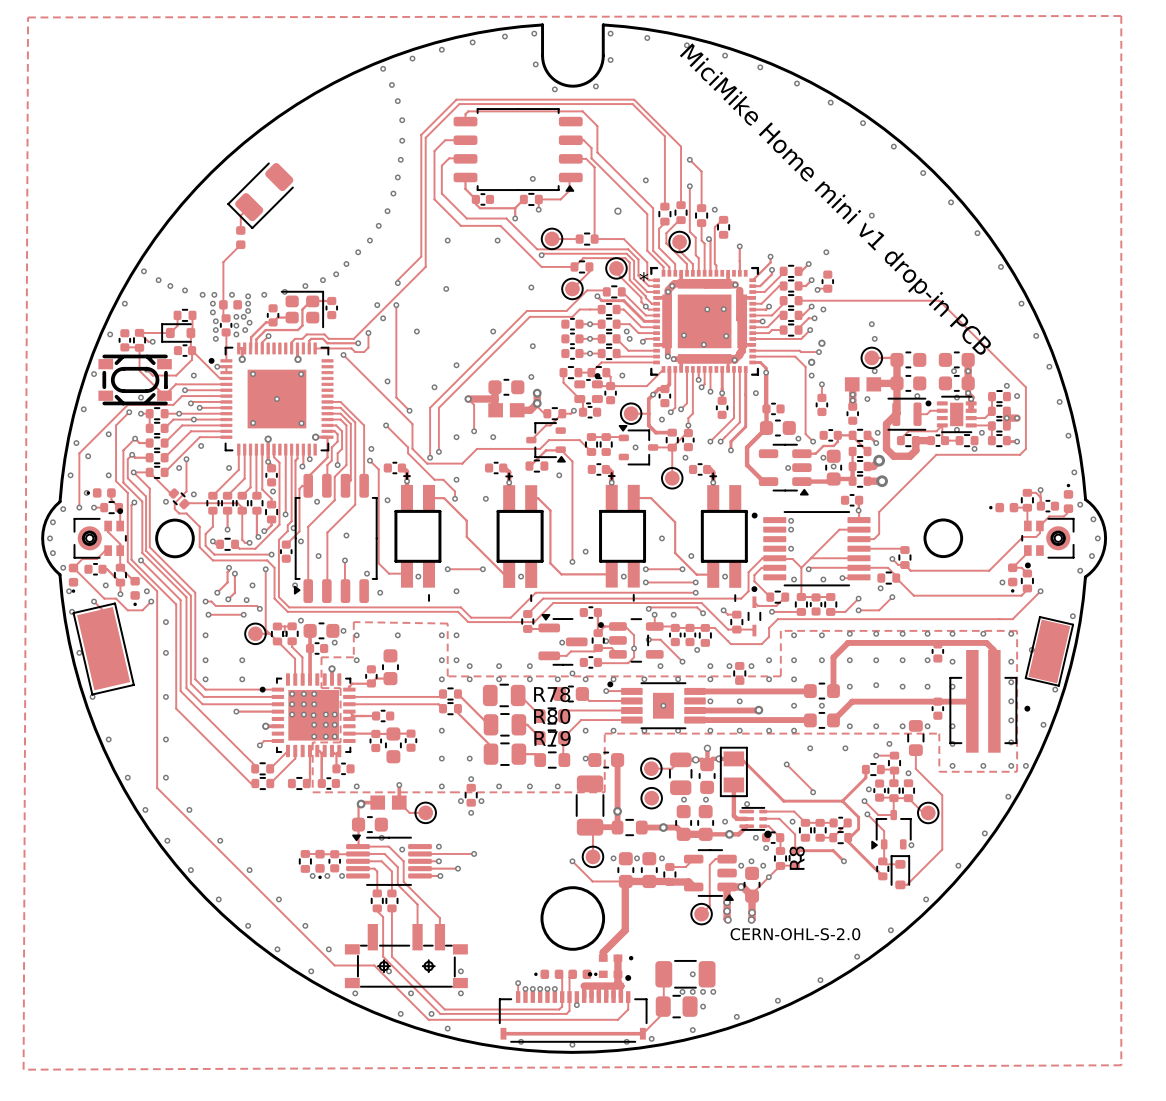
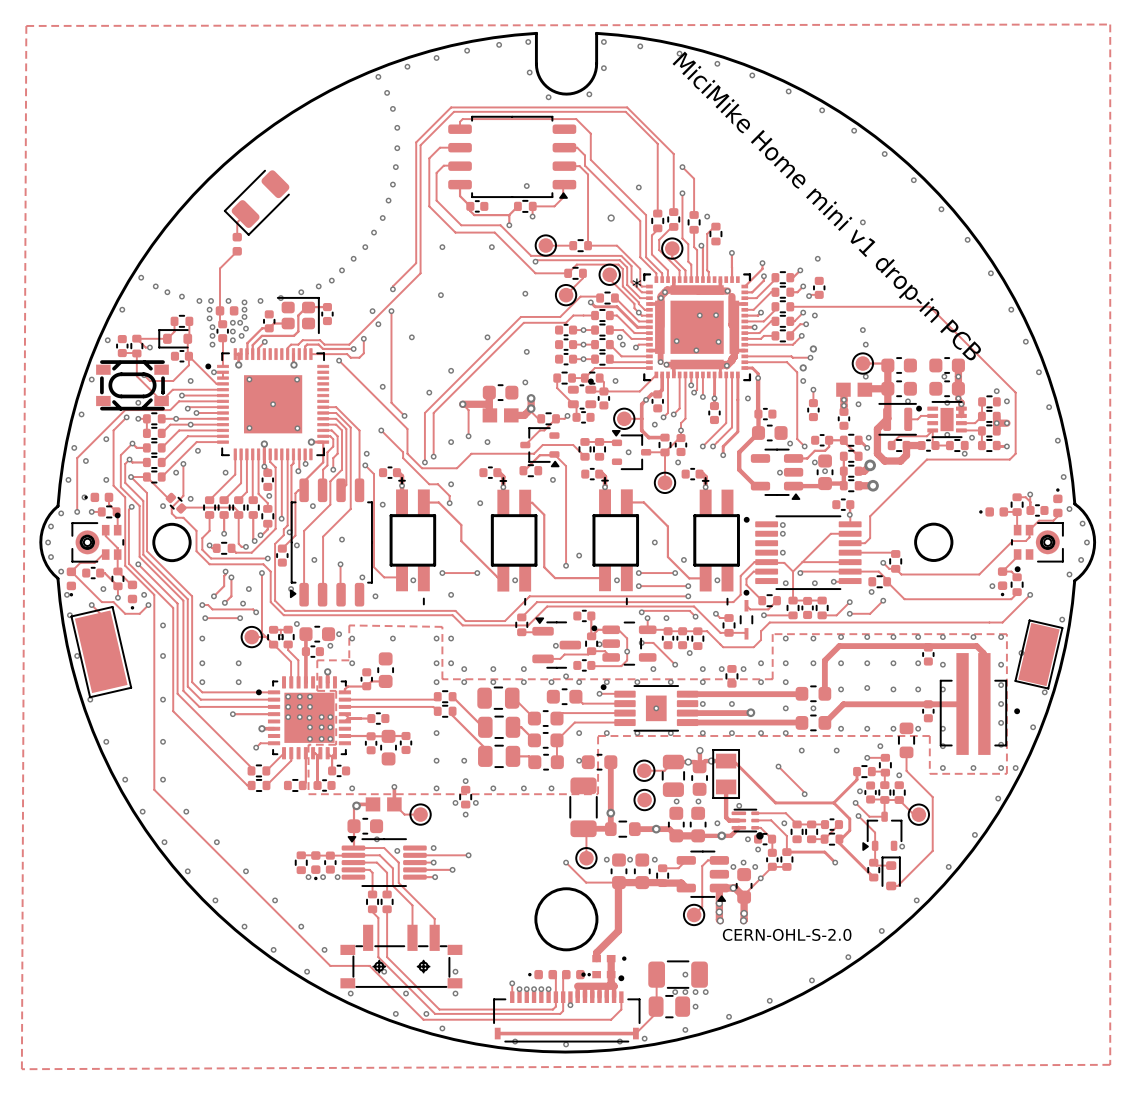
R78: (551, 716) -> none
part: none -> (545, 718)
R80: (551, 738) -> none
part: none -> (545, 740)
R79: (552, 760) -> none
part: none -> (546, 762)
R8: (780, 858) -> none
part: none -> (772, 859)

